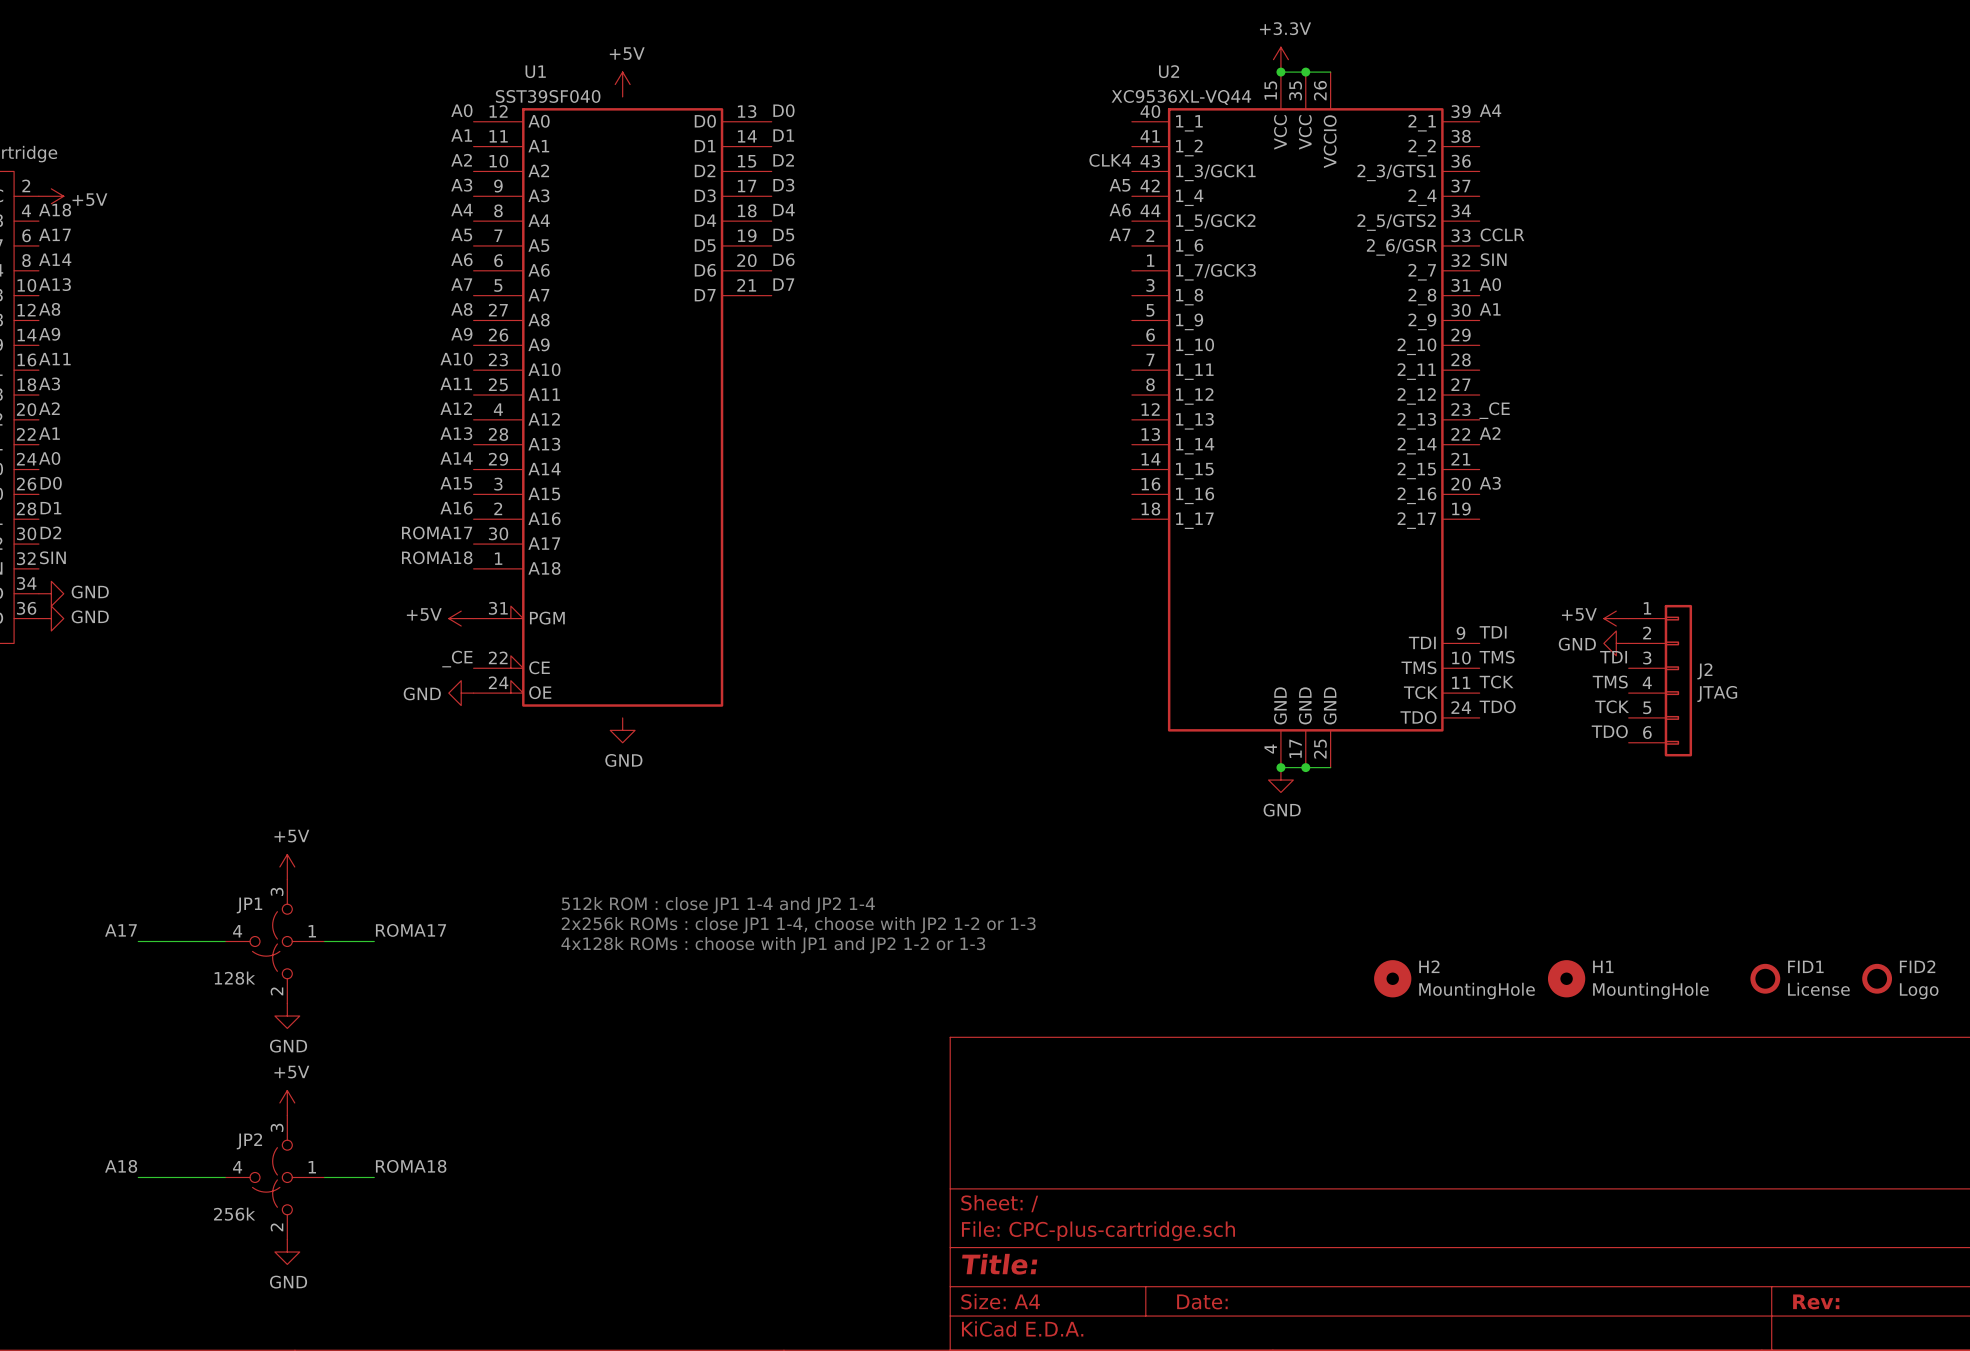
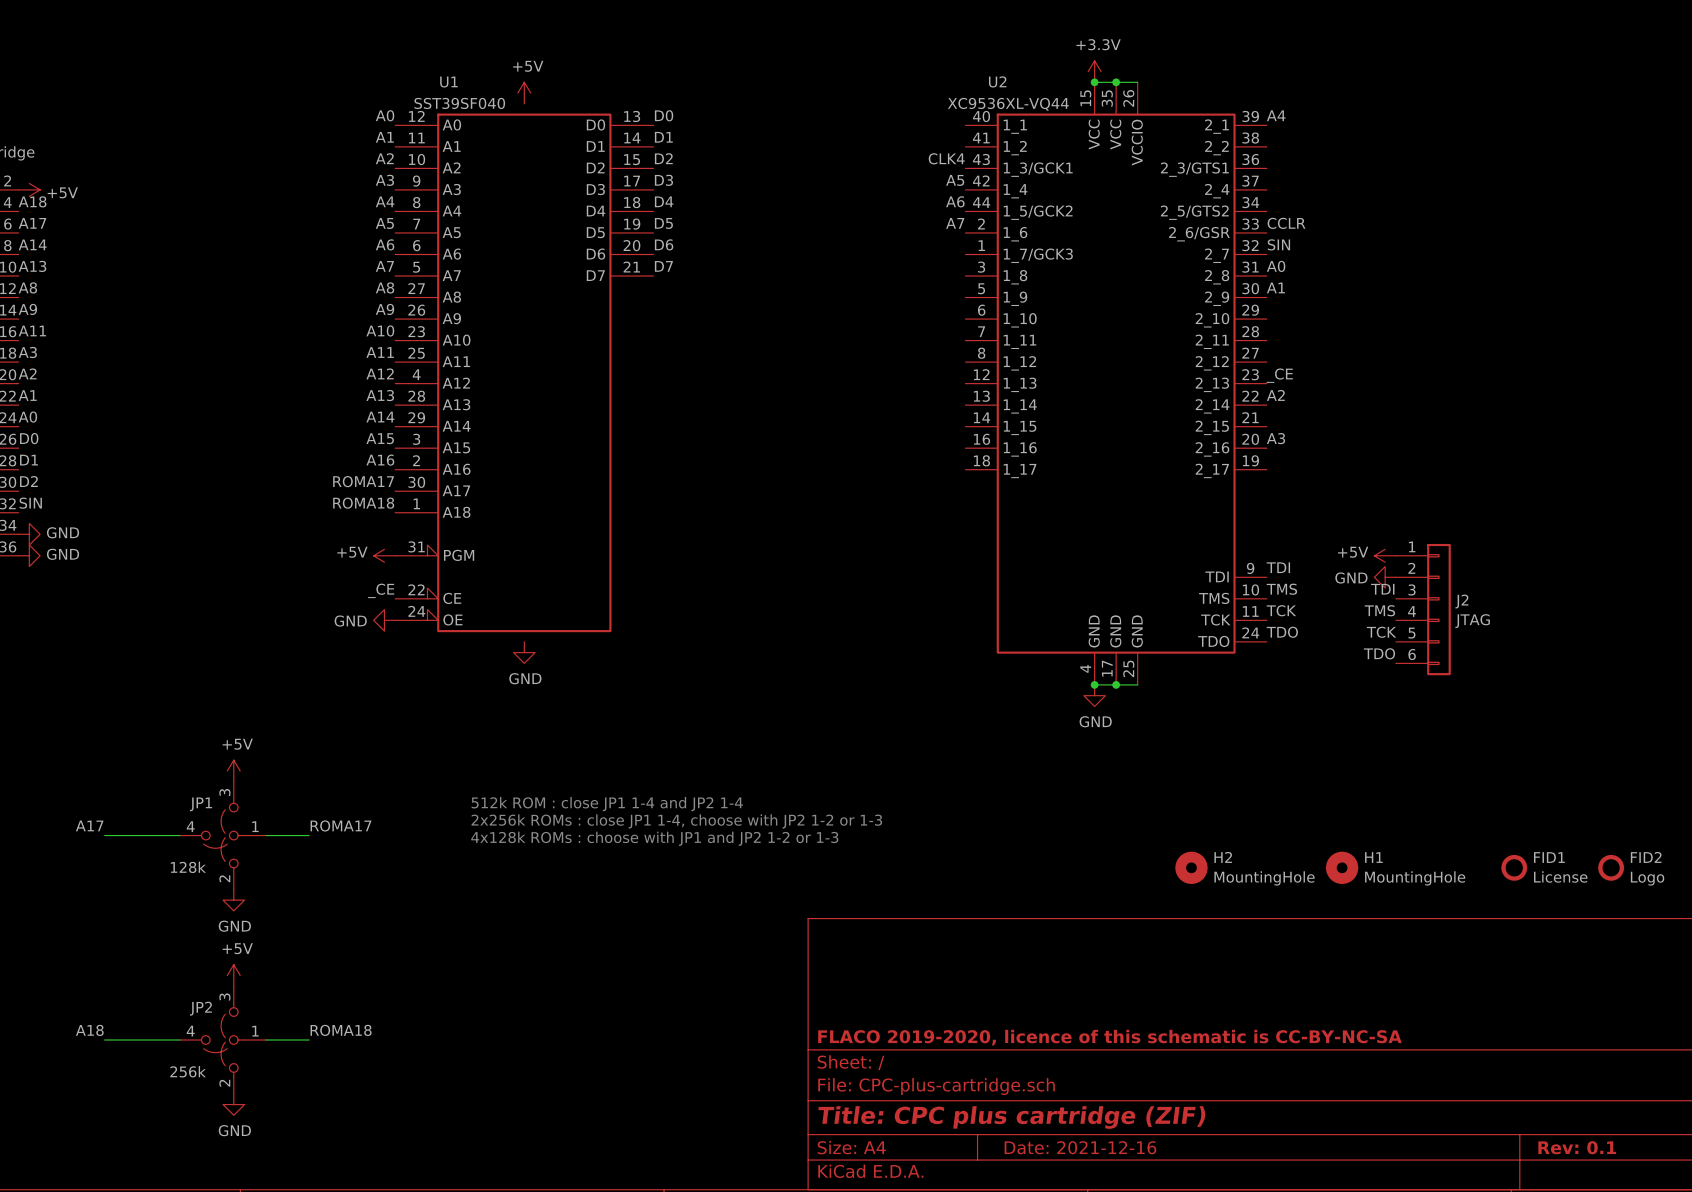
title block: none -> FLACO 2019-2020, licence of this schematic is CC-BY-NC-SA (1109, 1037)
title block: Title: (999, 1264) -> Title: CPC plus cartridge (ZIF) (1011, 1117)
title block: Date: (1202, 1301) -> Date: 2021-12-16 (1080, 1147)
title block: Rev: (1816, 1301) -> Rev: 0.1 (1577, 1147)

